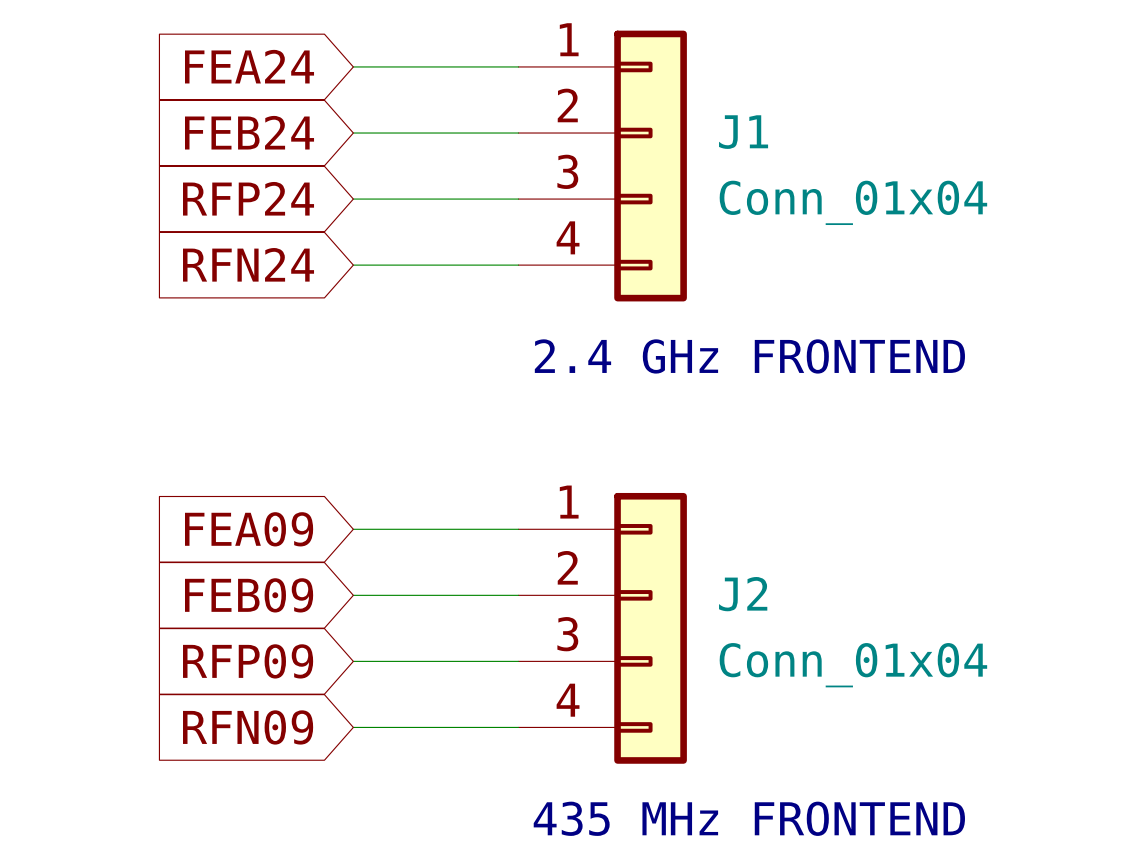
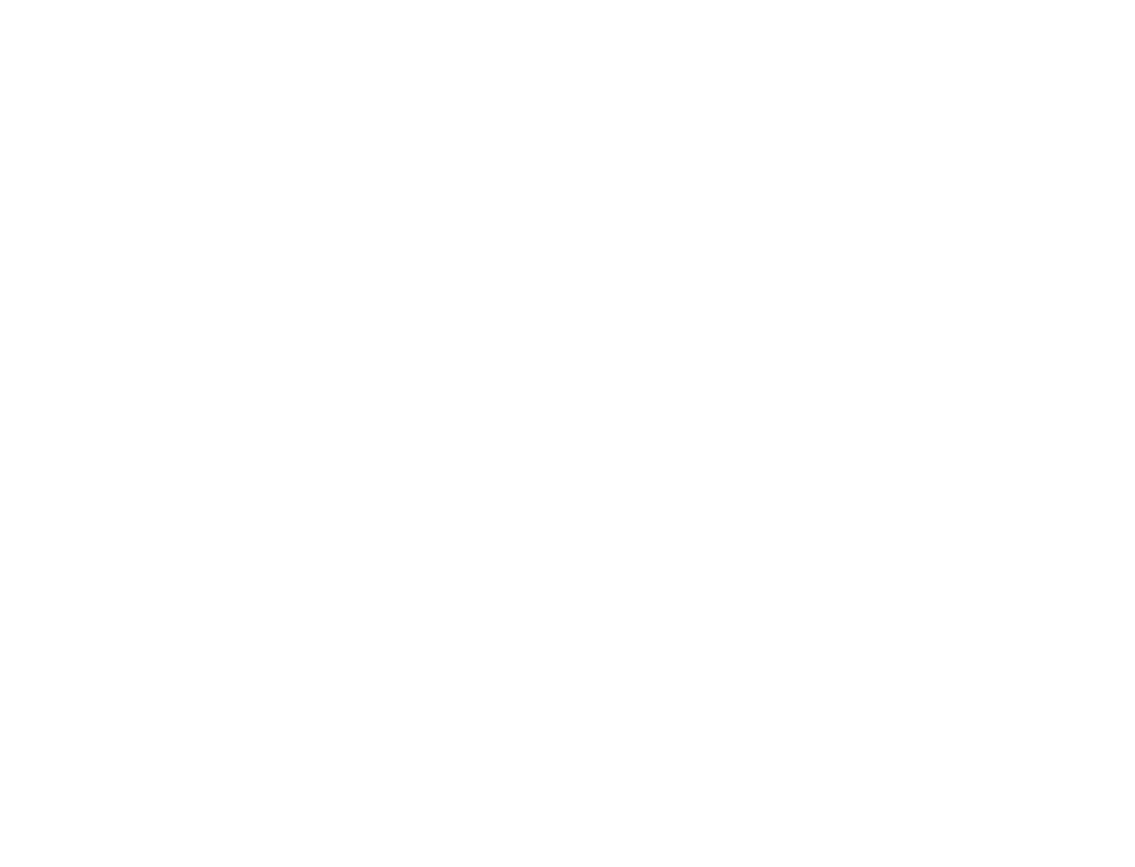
global label: FEA24 (249, 66) -> none
wire: (353, 66) (518, 66) -> none
global label: FEB24 (249, 132) -> none
wire: (353, 133) (518, 133) -> none
J1: Conn_01x04 (602, 166) -> none
global label: RFP24 (248, 198) -> none
wire: (353, 199) (518, 199) -> none
global label: RFN24 (248, 264) -> none
wire: (353, 265) (518, 265) -> none
text: 2.4 GHz FRONTEND (749, 356) -> none
global label: FEA09 (249, 529) -> none
wire: (353, 529) (518, 529) -> none
global label: FEB09 (249, 595) -> none
wire: (353, 595) (518, 595) -> none
J2: Conn_01x04 (602, 628) -> none
global label: RFP09 (248, 661) -> none
wire: (353, 661) (518, 661) -> none
global label: RFN09 (248, 727) -> none
wire: (353, 727) (518, 727) -> none
text: 435 MHz FRONTEND (749, 818) -> none

